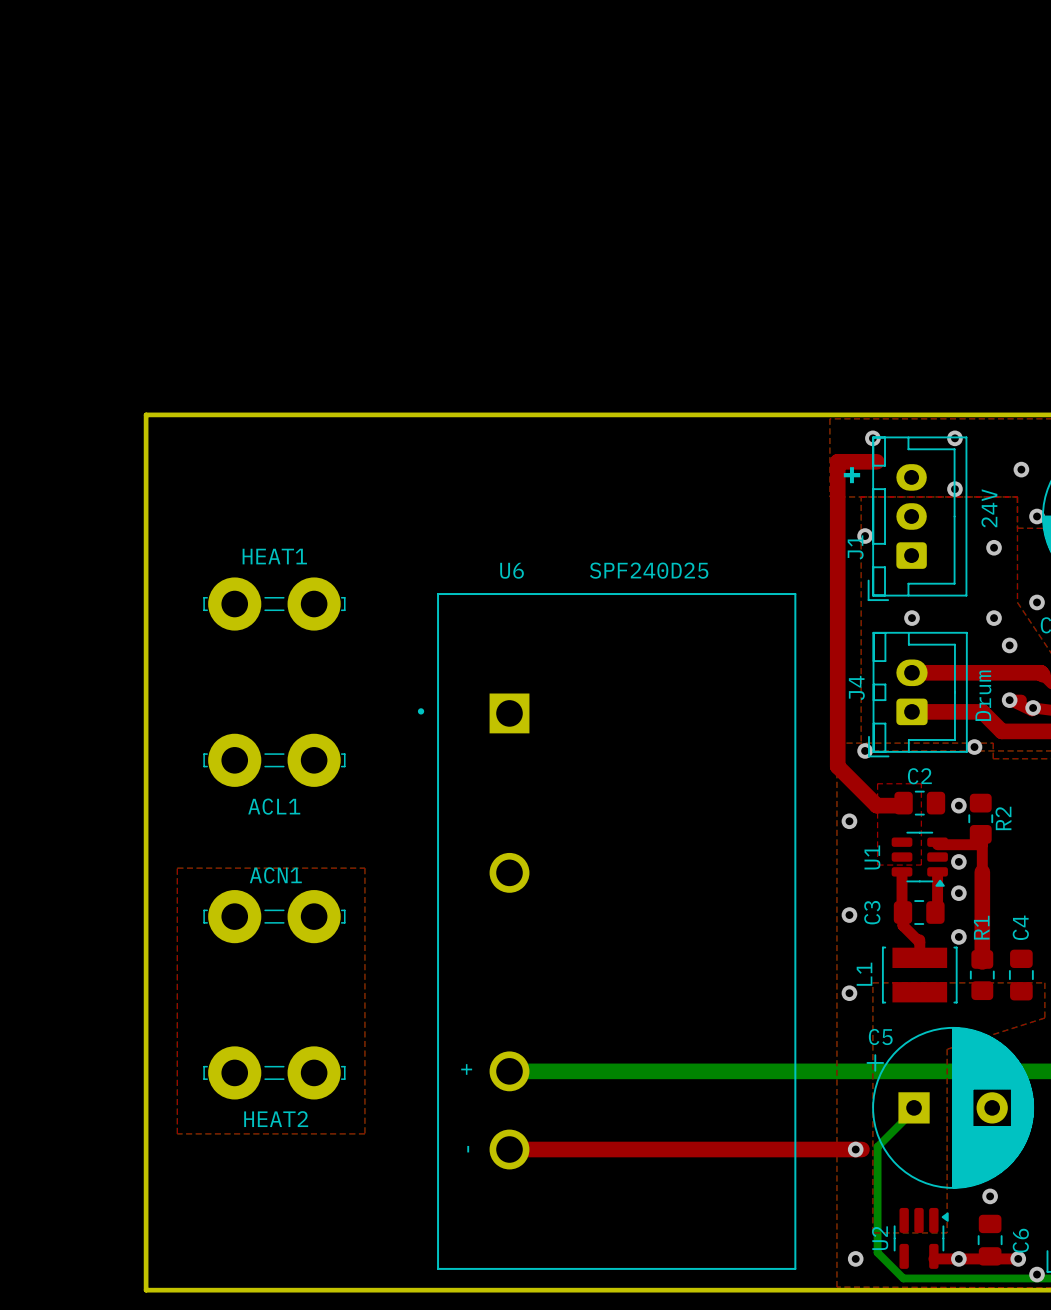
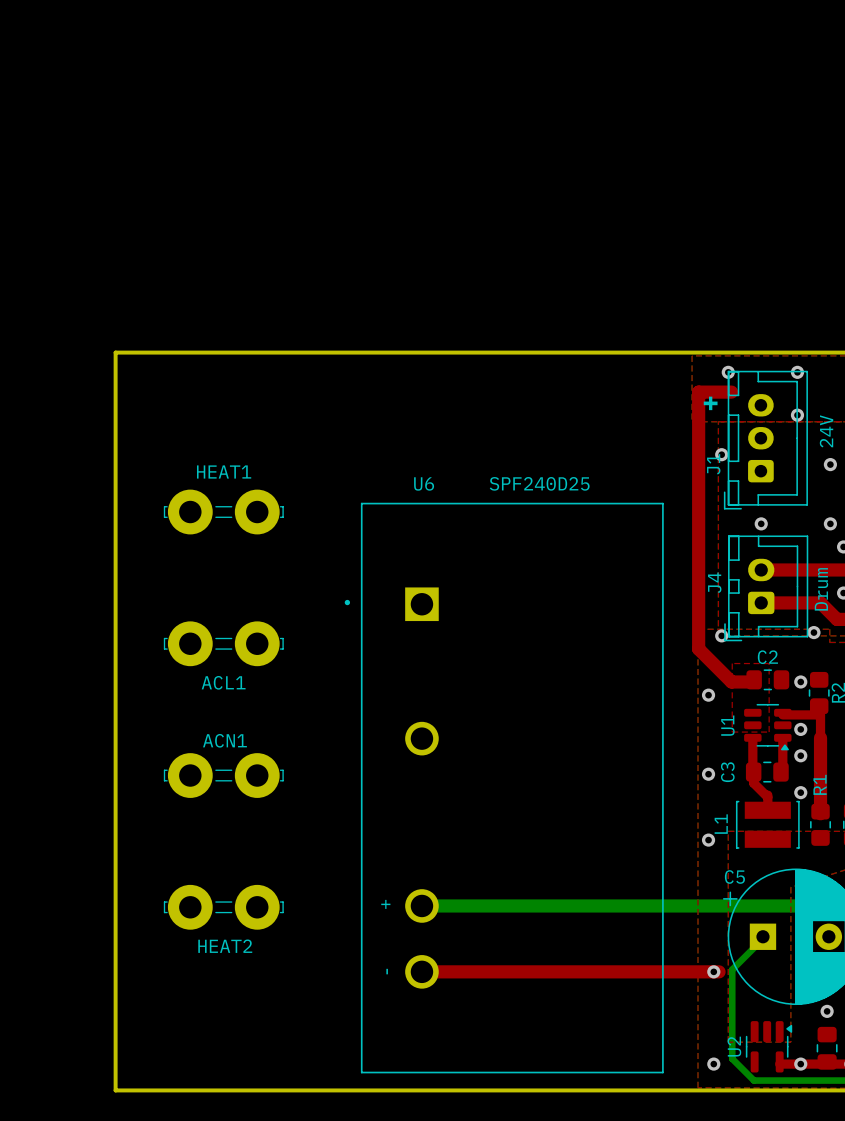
top zone outline: (177, 868) (364, 868) (364, 1133) (177, 1133) (177, 868) -> none

